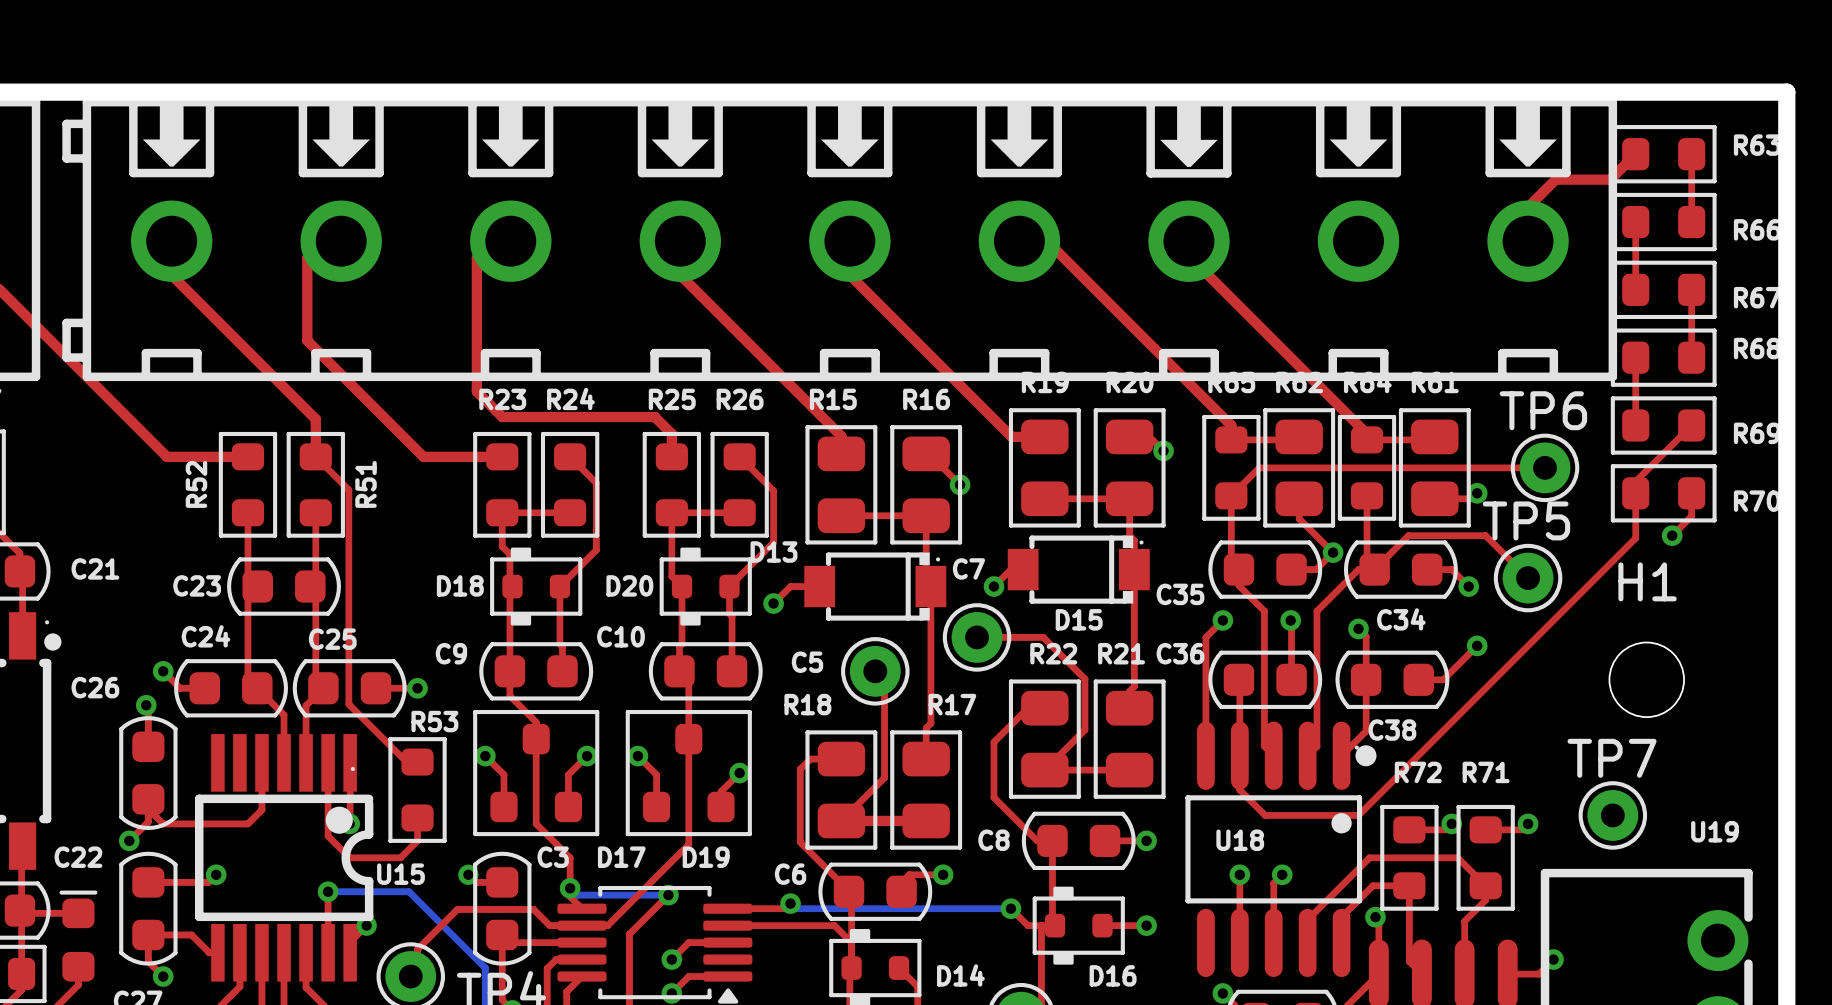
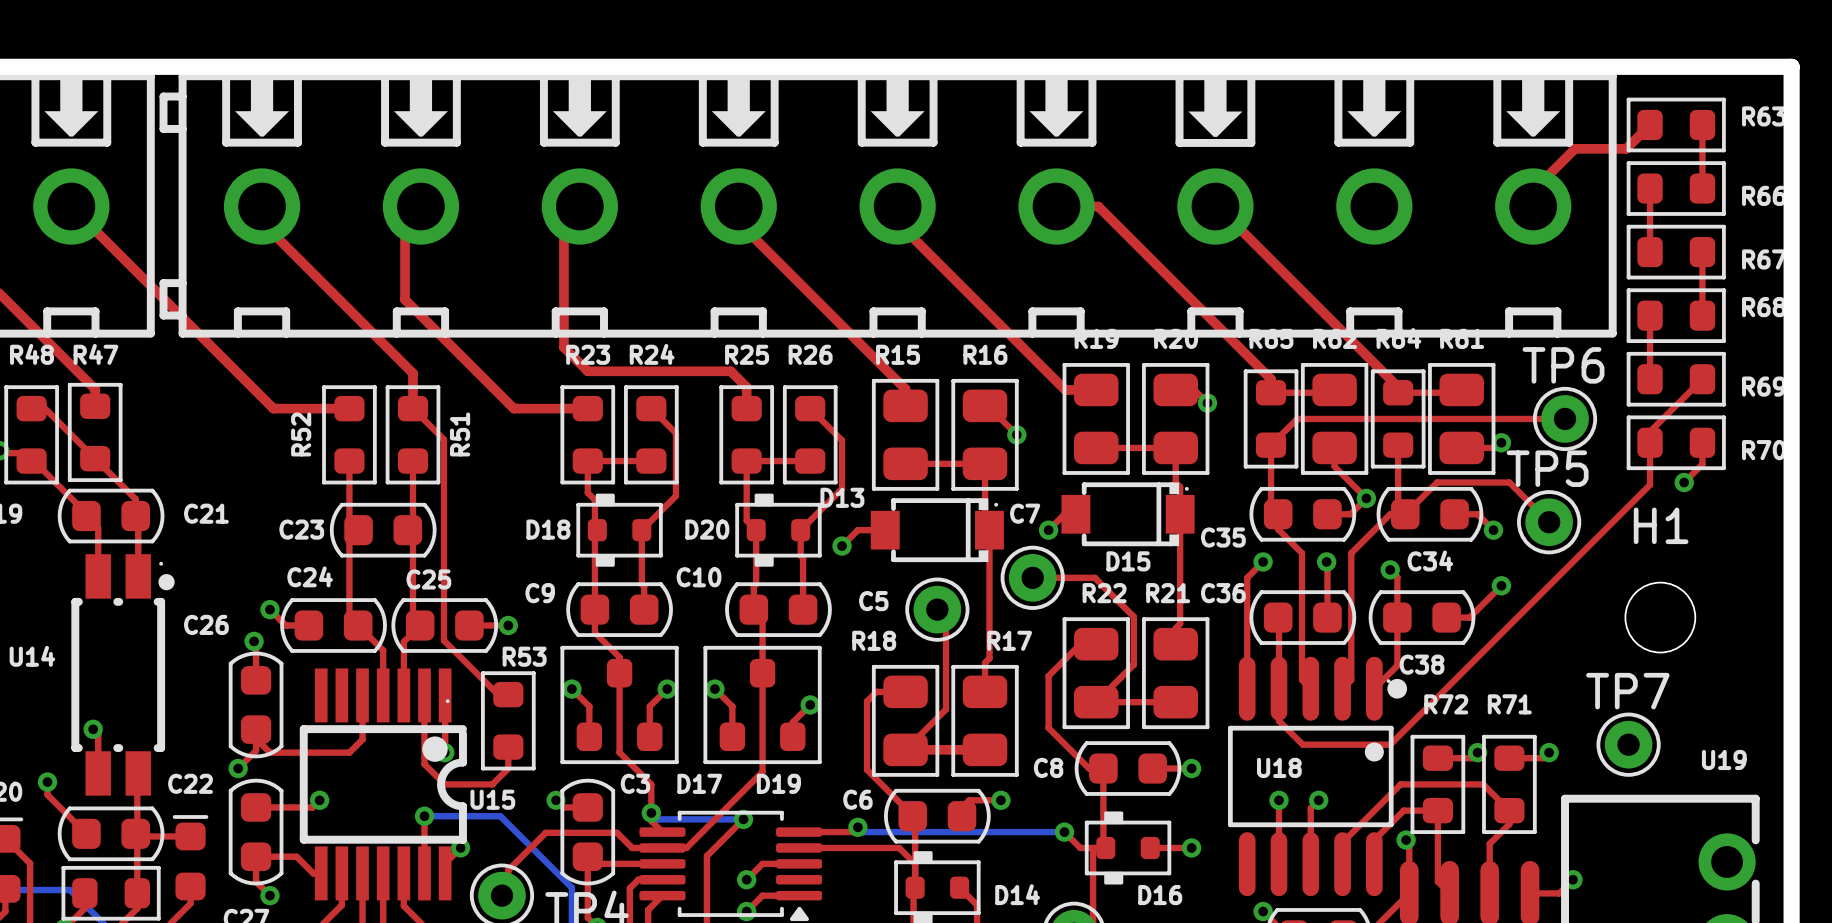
part position: (839, 239) -> (888, 204)

